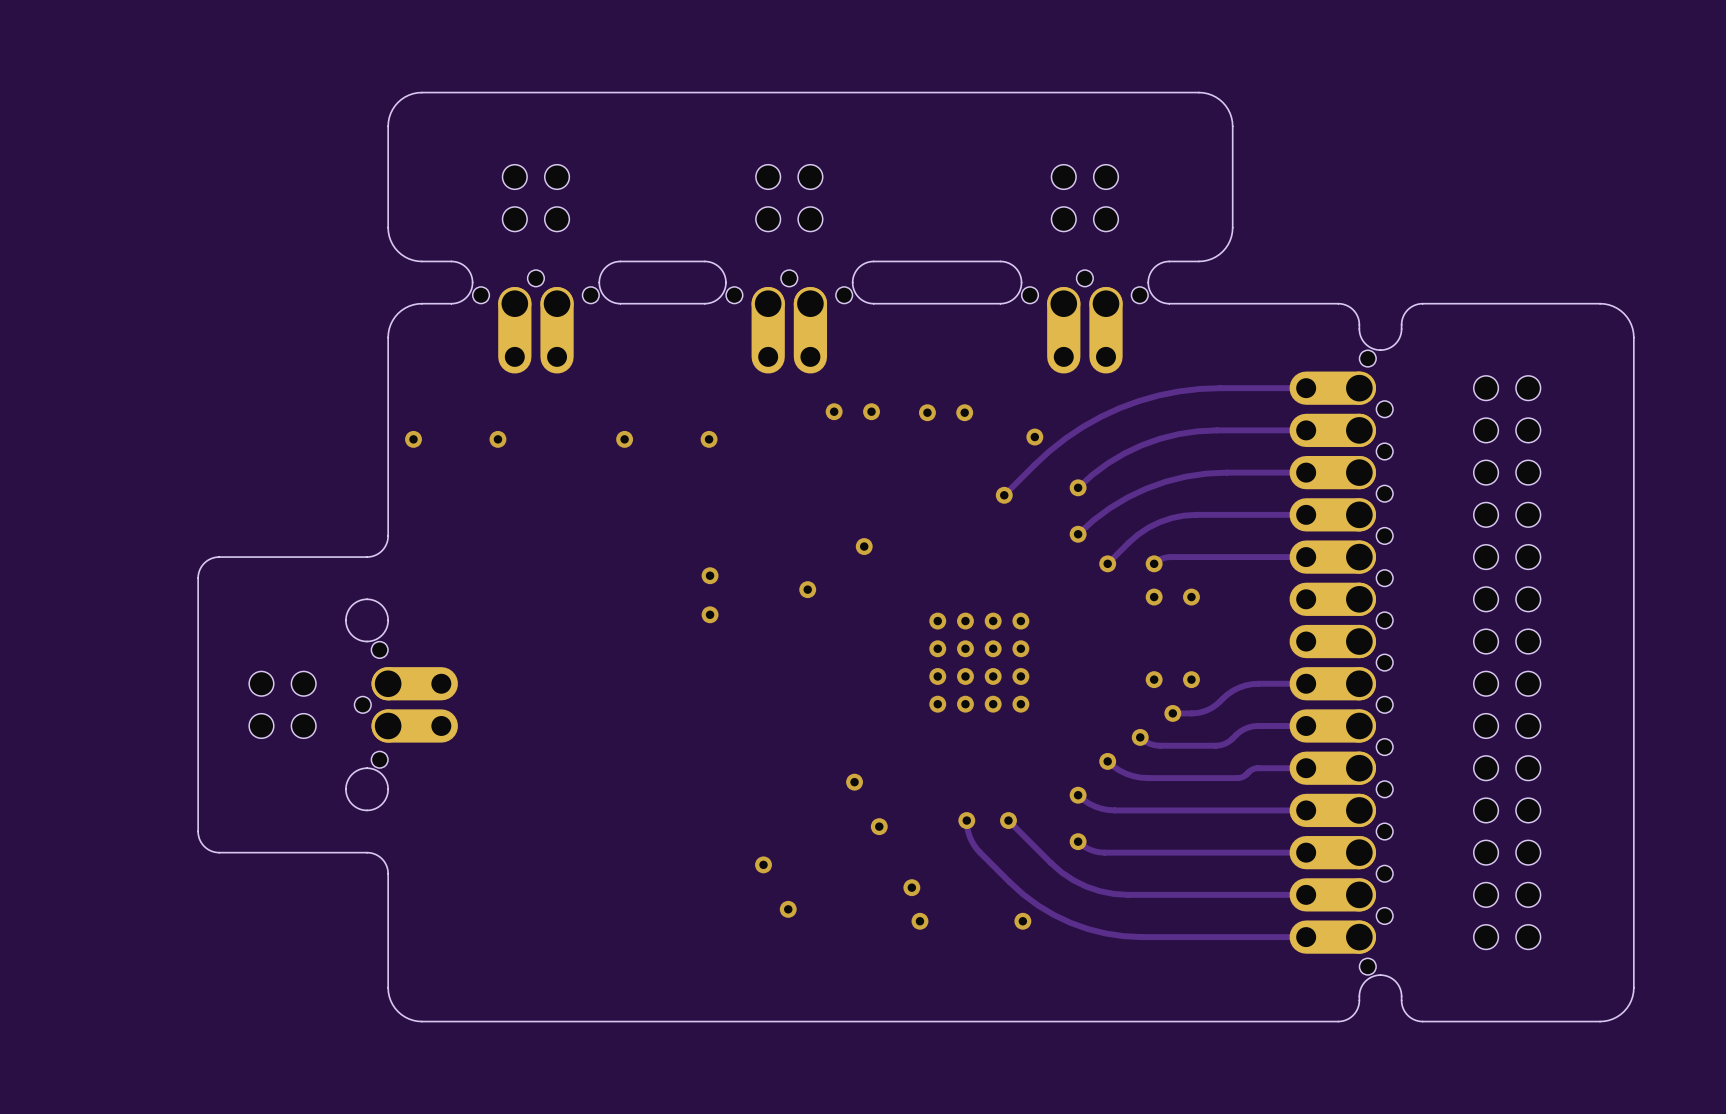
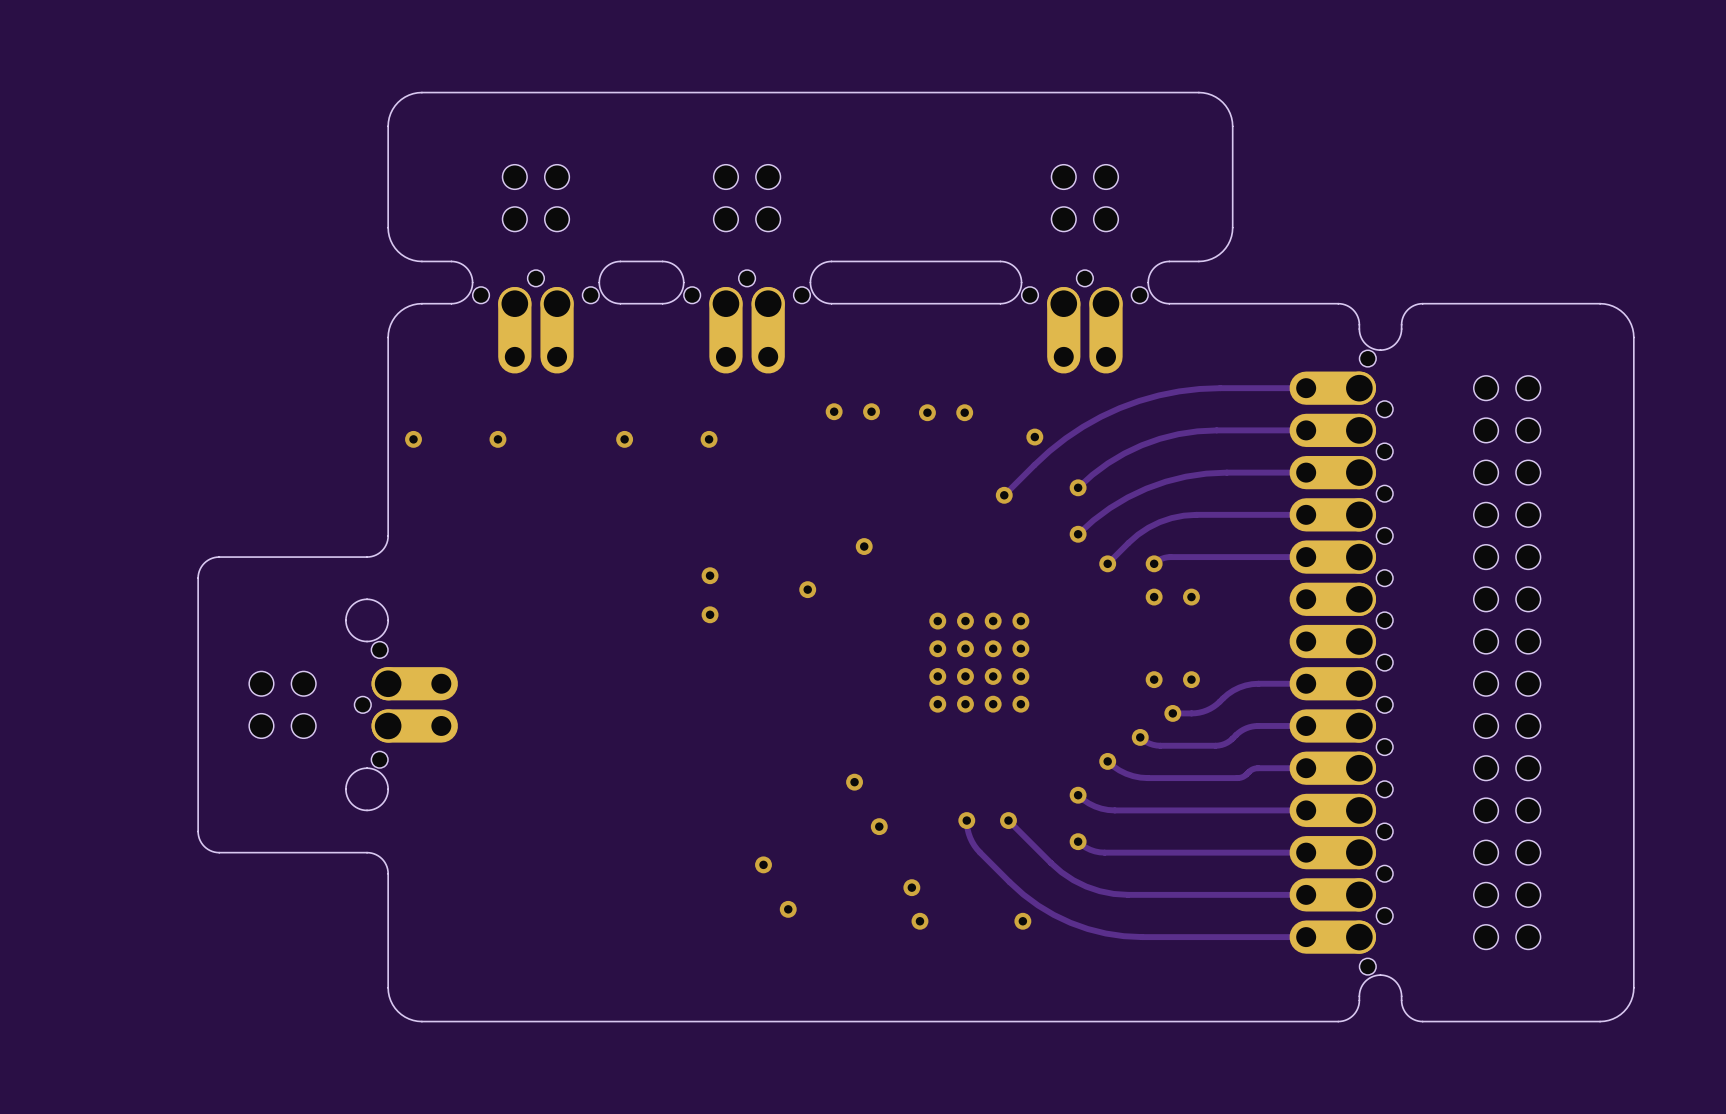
part position: (789, 198) -> (747, 198)
board edge: (662, 261) (711, 262) (722, 271) (725, 282) (721, 295) (711, 302) (662, 303) -> (662, 261) (671, 263) (677, 267) (682, 275) (683, 282) (682, 289) (677, 297) (669, 302) (662, 303)
board edge: (873, 261) (864, 263) (858, 267) (854, 273) (852, 282) (854, 291) (858, 297) (866, 302) (873, 303) -> (873, 261) (824, 262) (813, 271) (810, 282) (815, 295) (824, 302) (873, 303)
part position: (789, 286) -> (747, 286)
part position: (810, 330) -> (725, 330)

